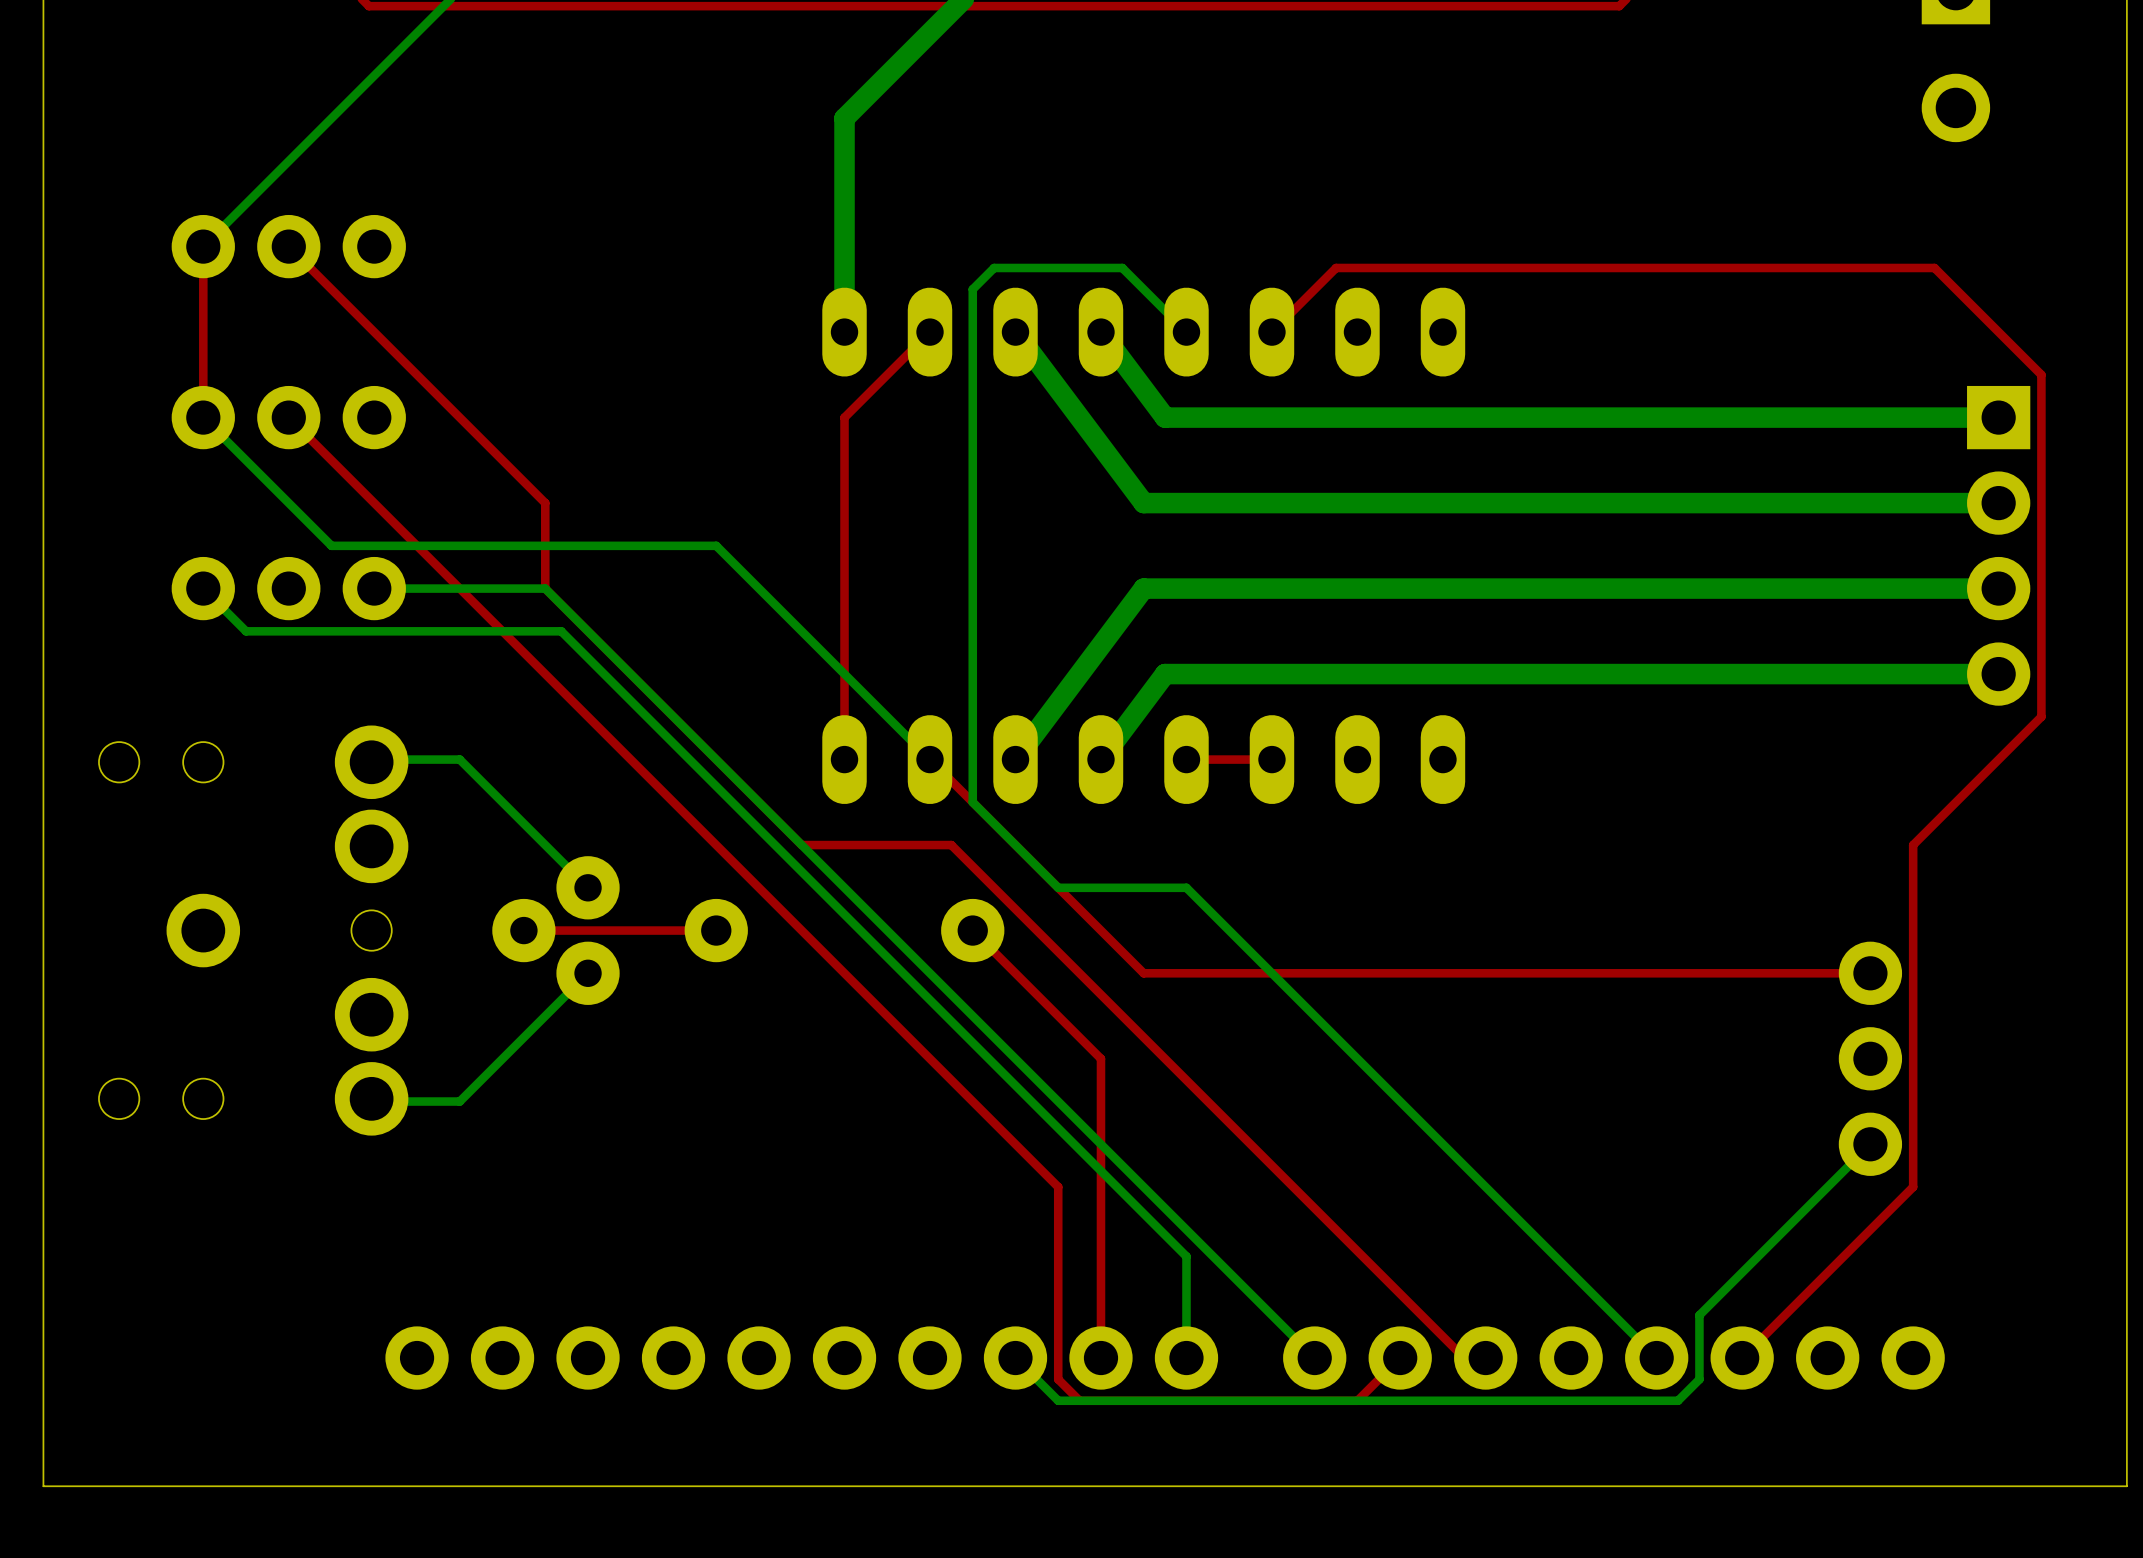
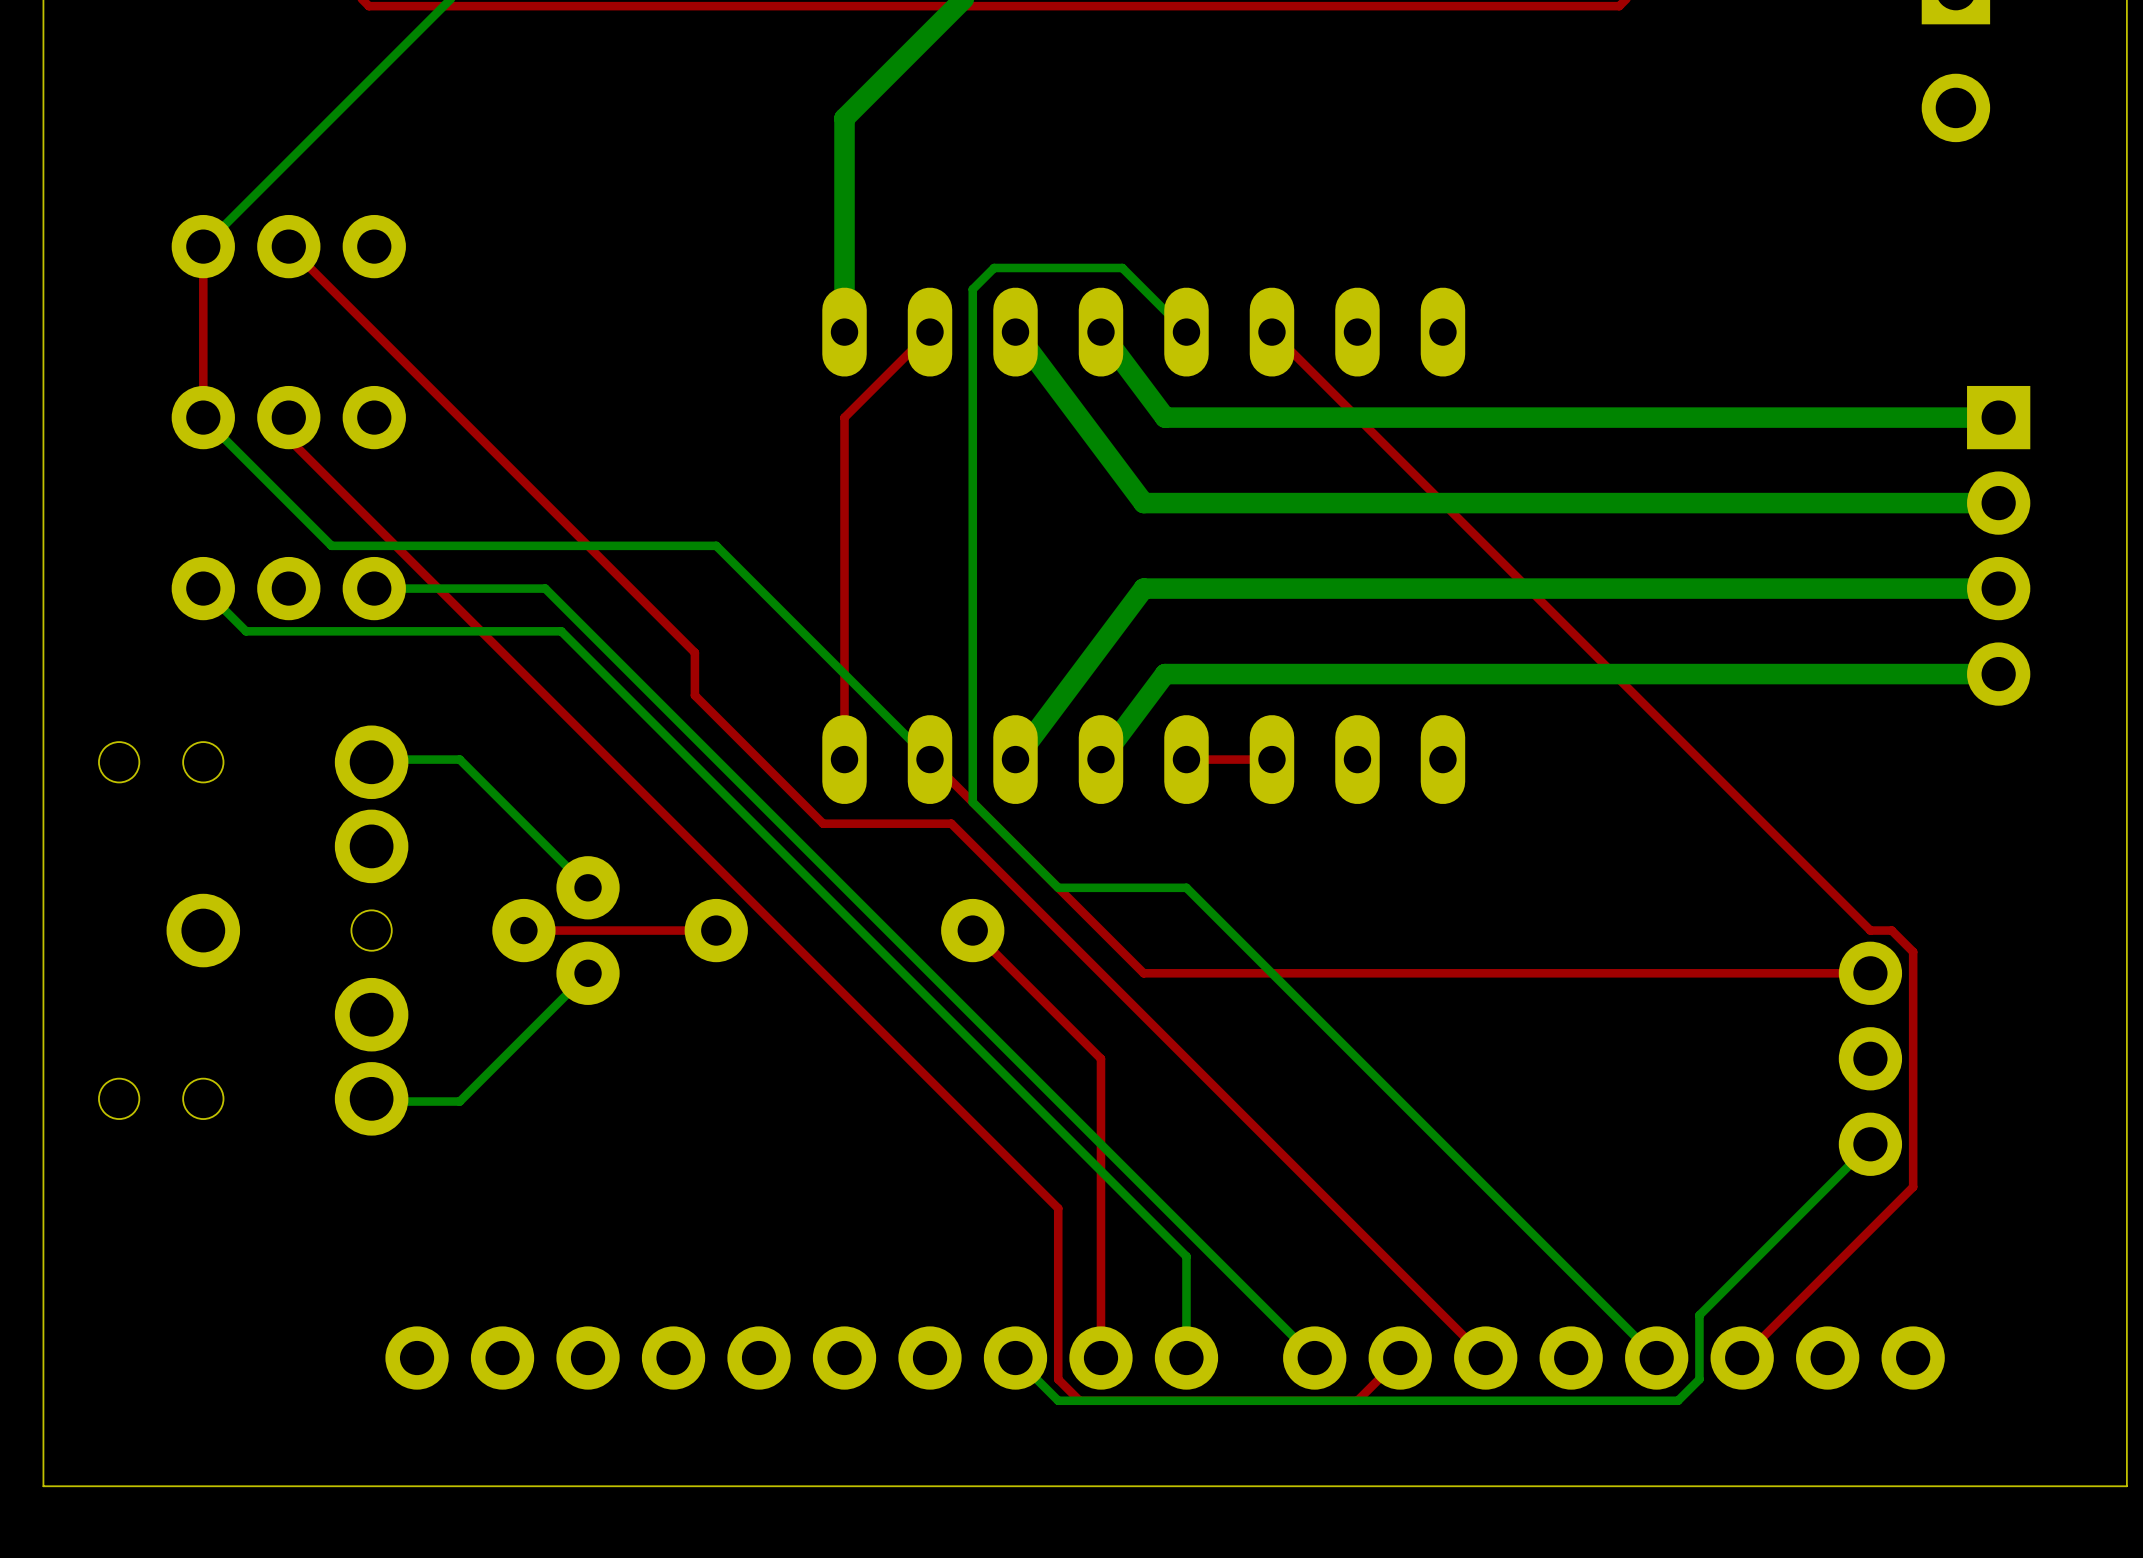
top track: (1271, 332) (1336, 267) (1934, 267) (2041, 374) (2041, 716) (1913, 845) (1913, 951) -> (1271, 332) (1870, 930) (1891, 930) (1913, 951)
top track: (288, 417) (1058, 1187) (1058, 1208) -> (288, 417) (288, 438) (1058, 1208)
top track: (545, 503) (545, 588) (801, 845) (951, 845) (1464, 1358) (1485, 1358) -> (545, 503) (694, 652) (694, 695) (823, 823) (951, 823) (1485, 1358)

